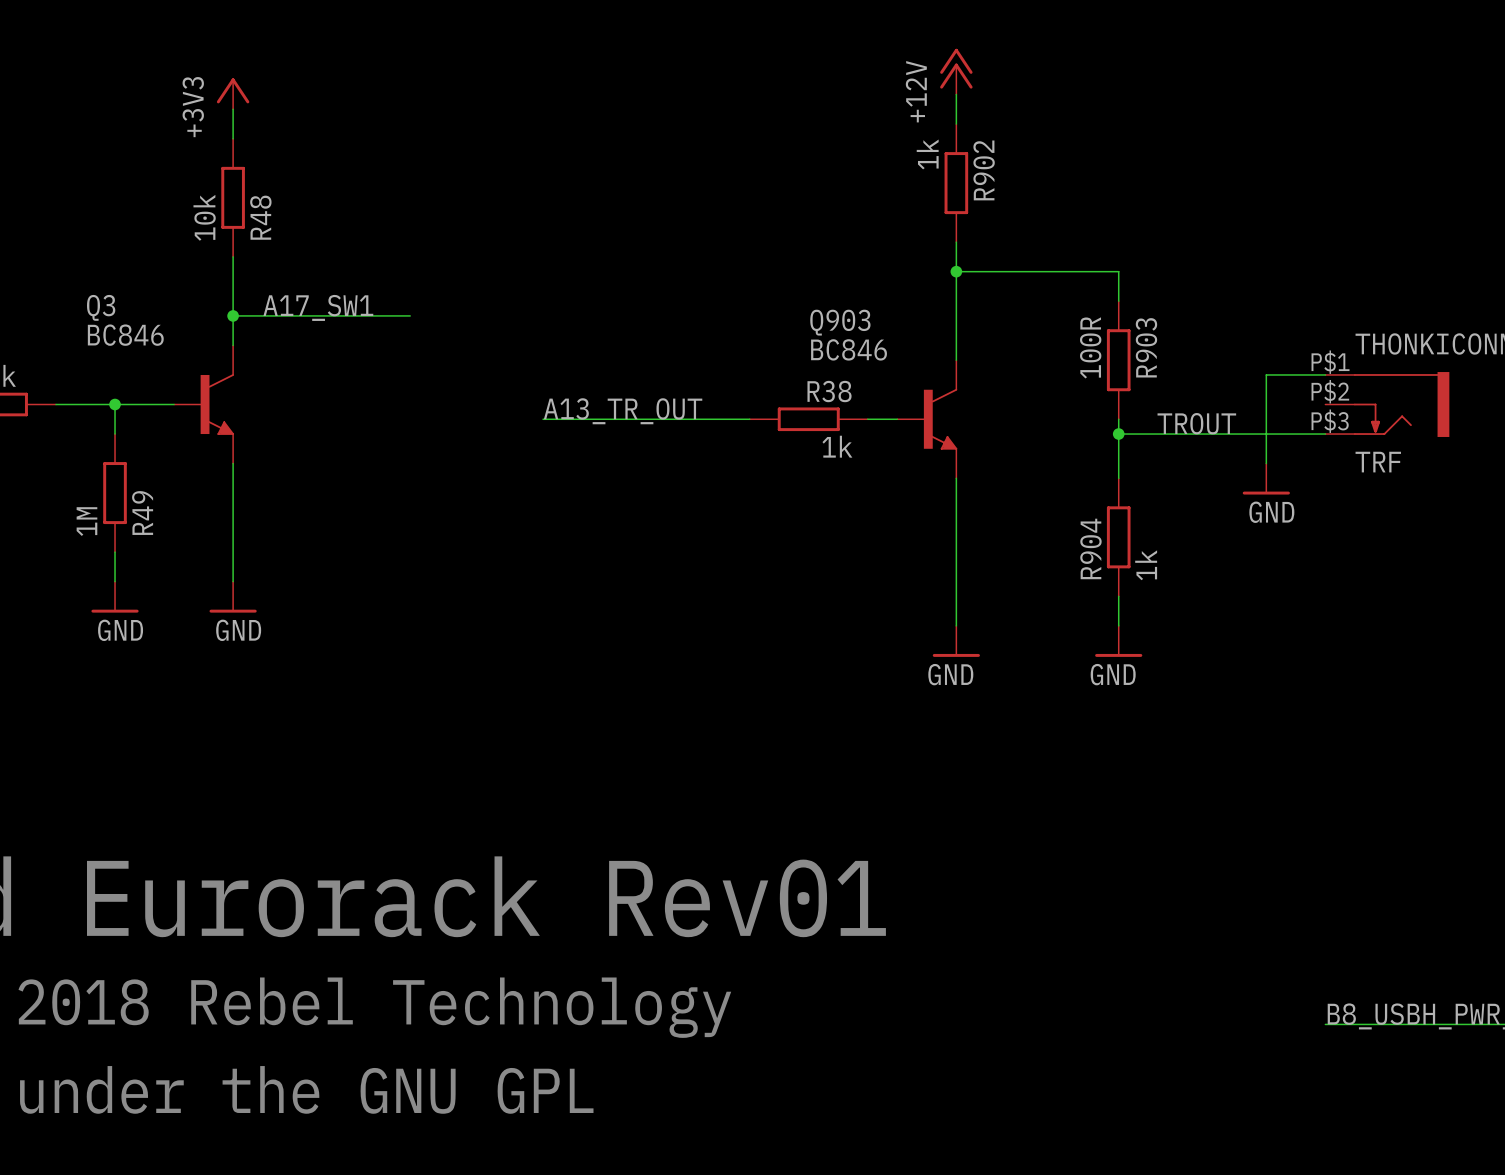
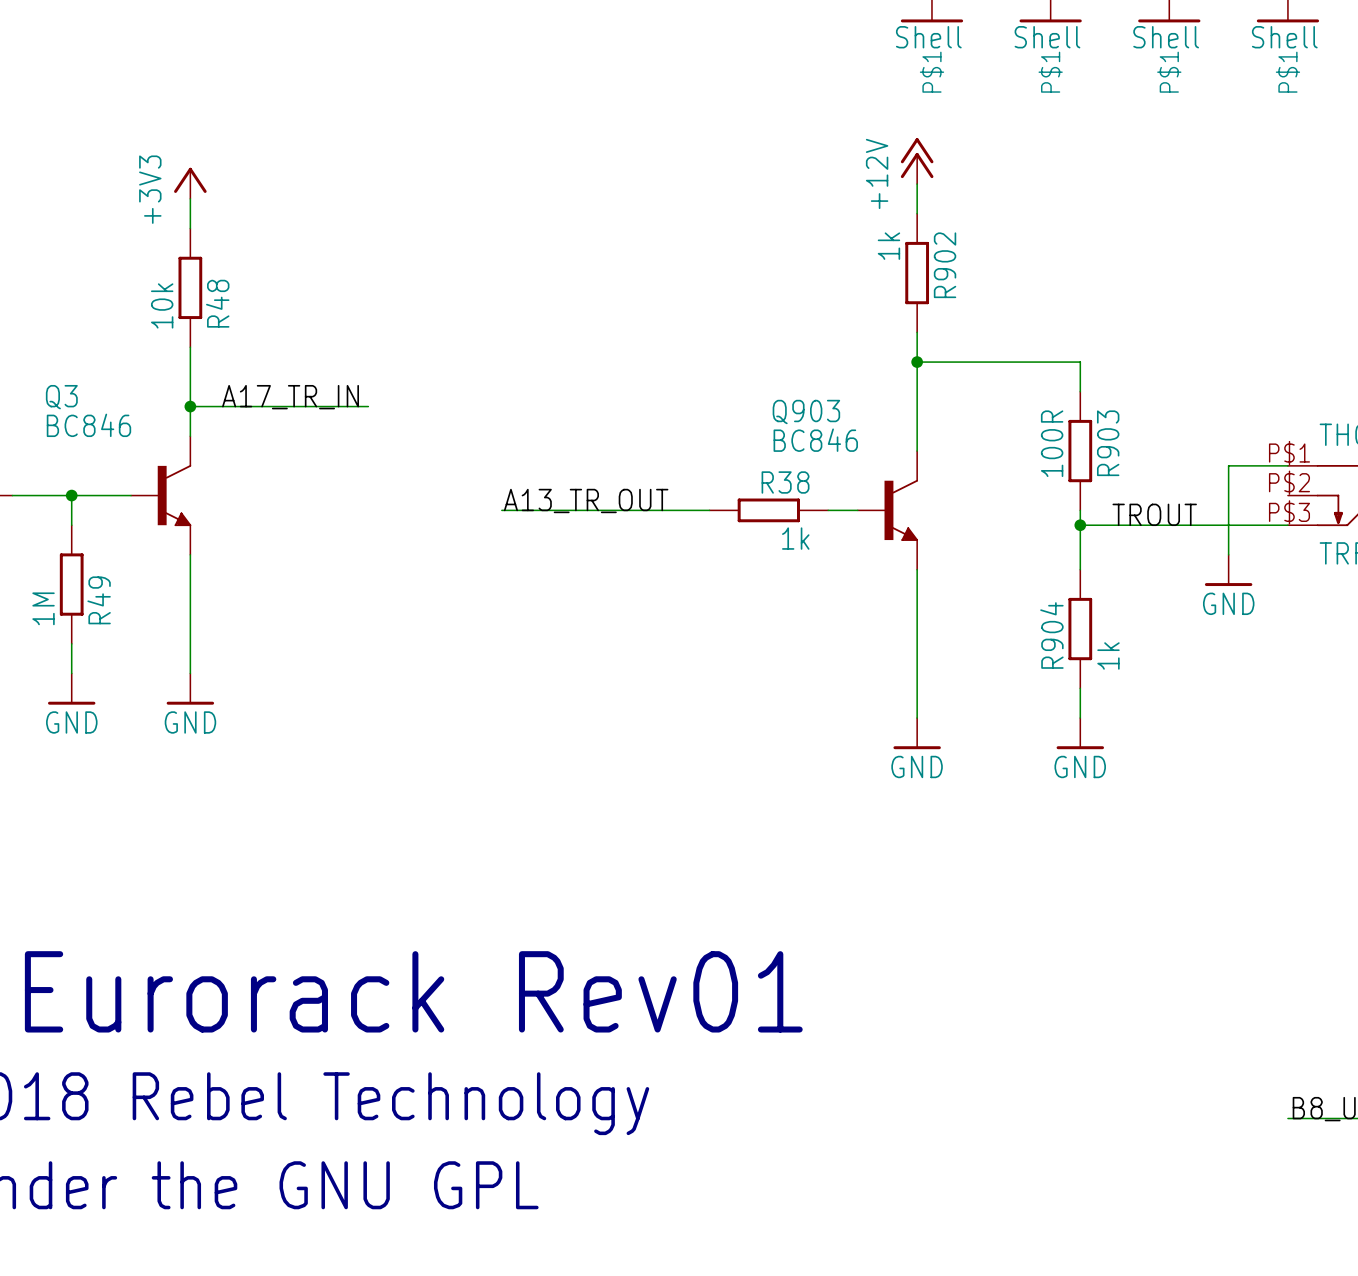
label: A17_SW1 (318, 307) -> A17_TR_IN (290, 397)

